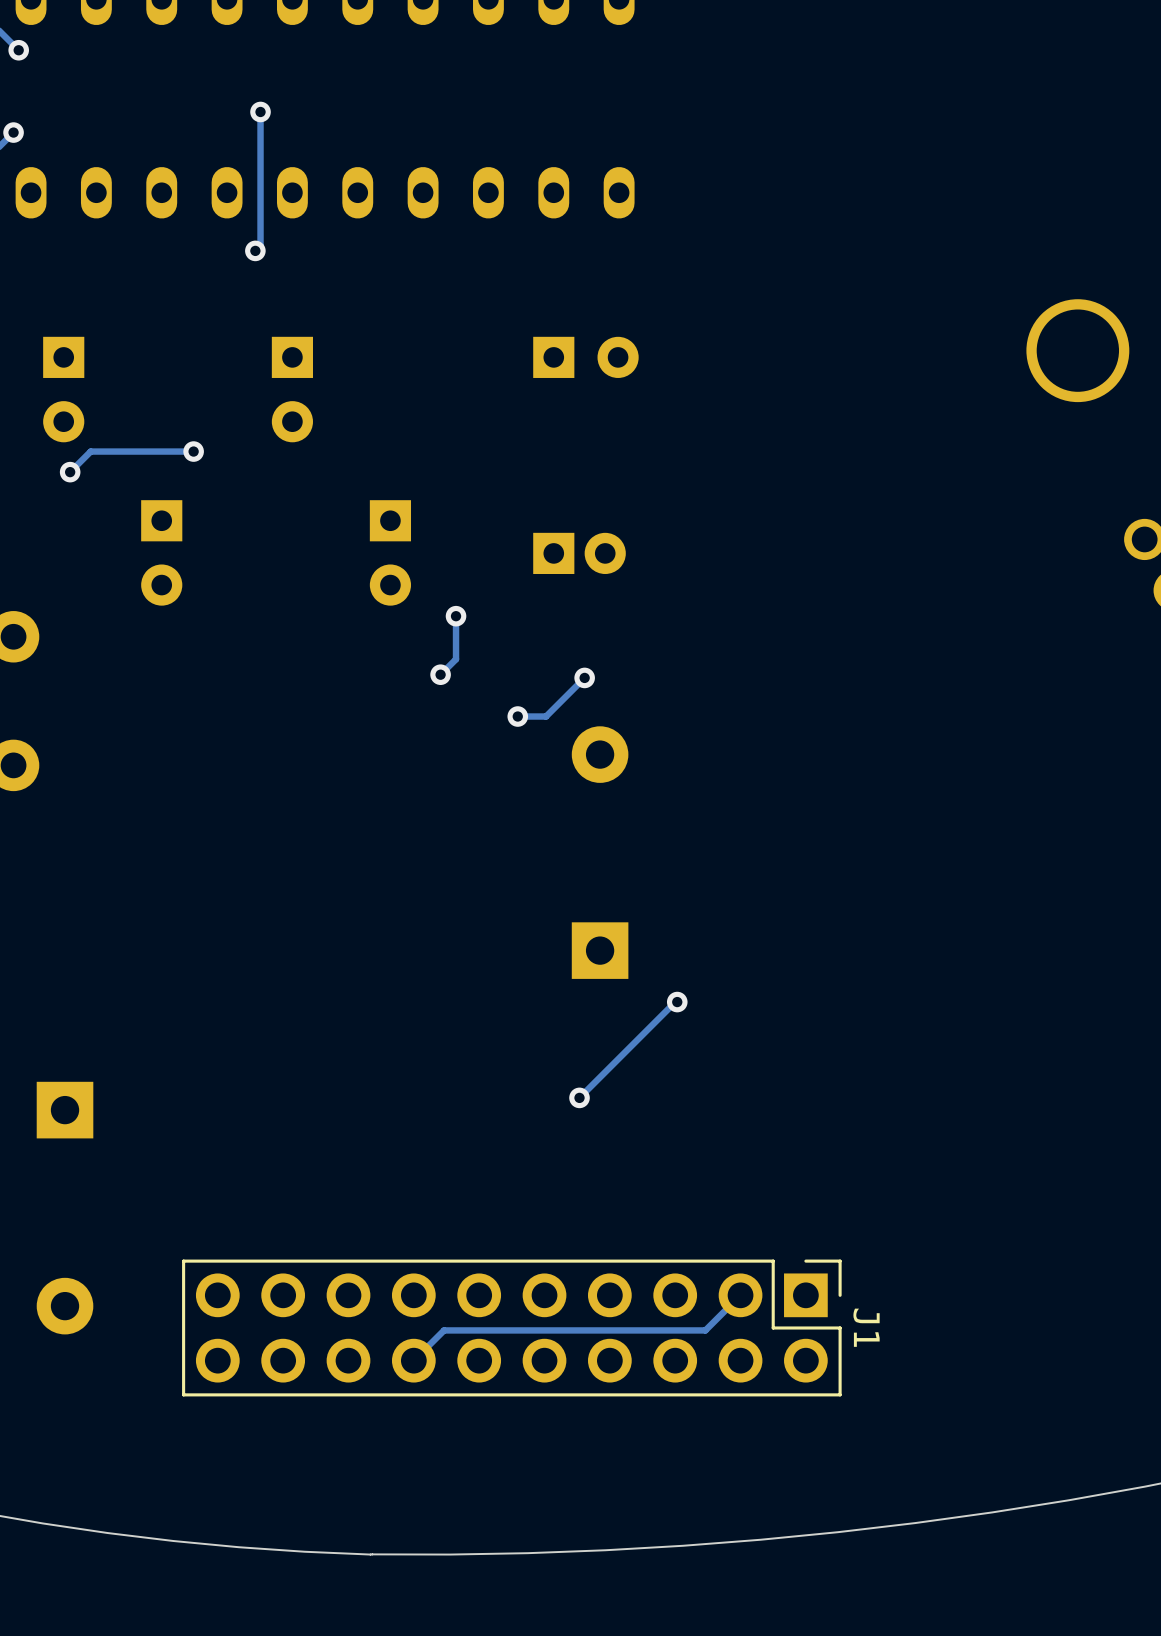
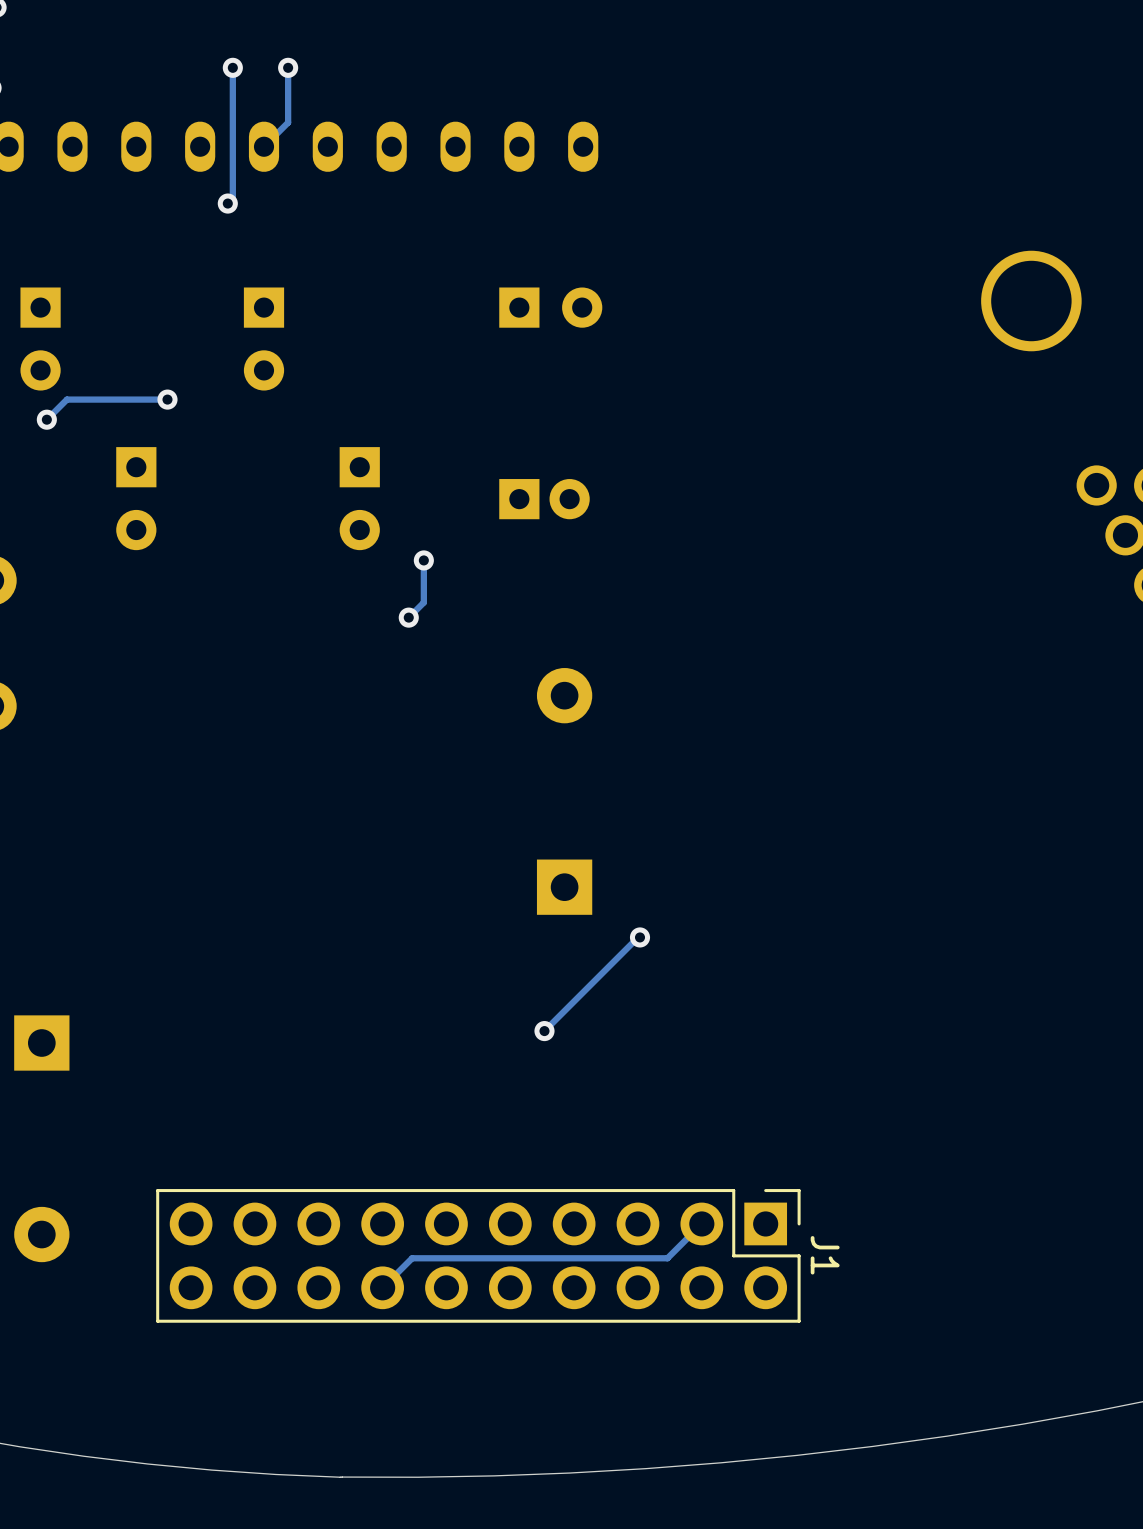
track: none -> (288, 67) (288, 122) (264, 146)
via: none -> (288, 67)
track: (584, 677) (546, 716) (517, 716) -> none
via: (584, 677) -> none
via: (517, 716) -> none

